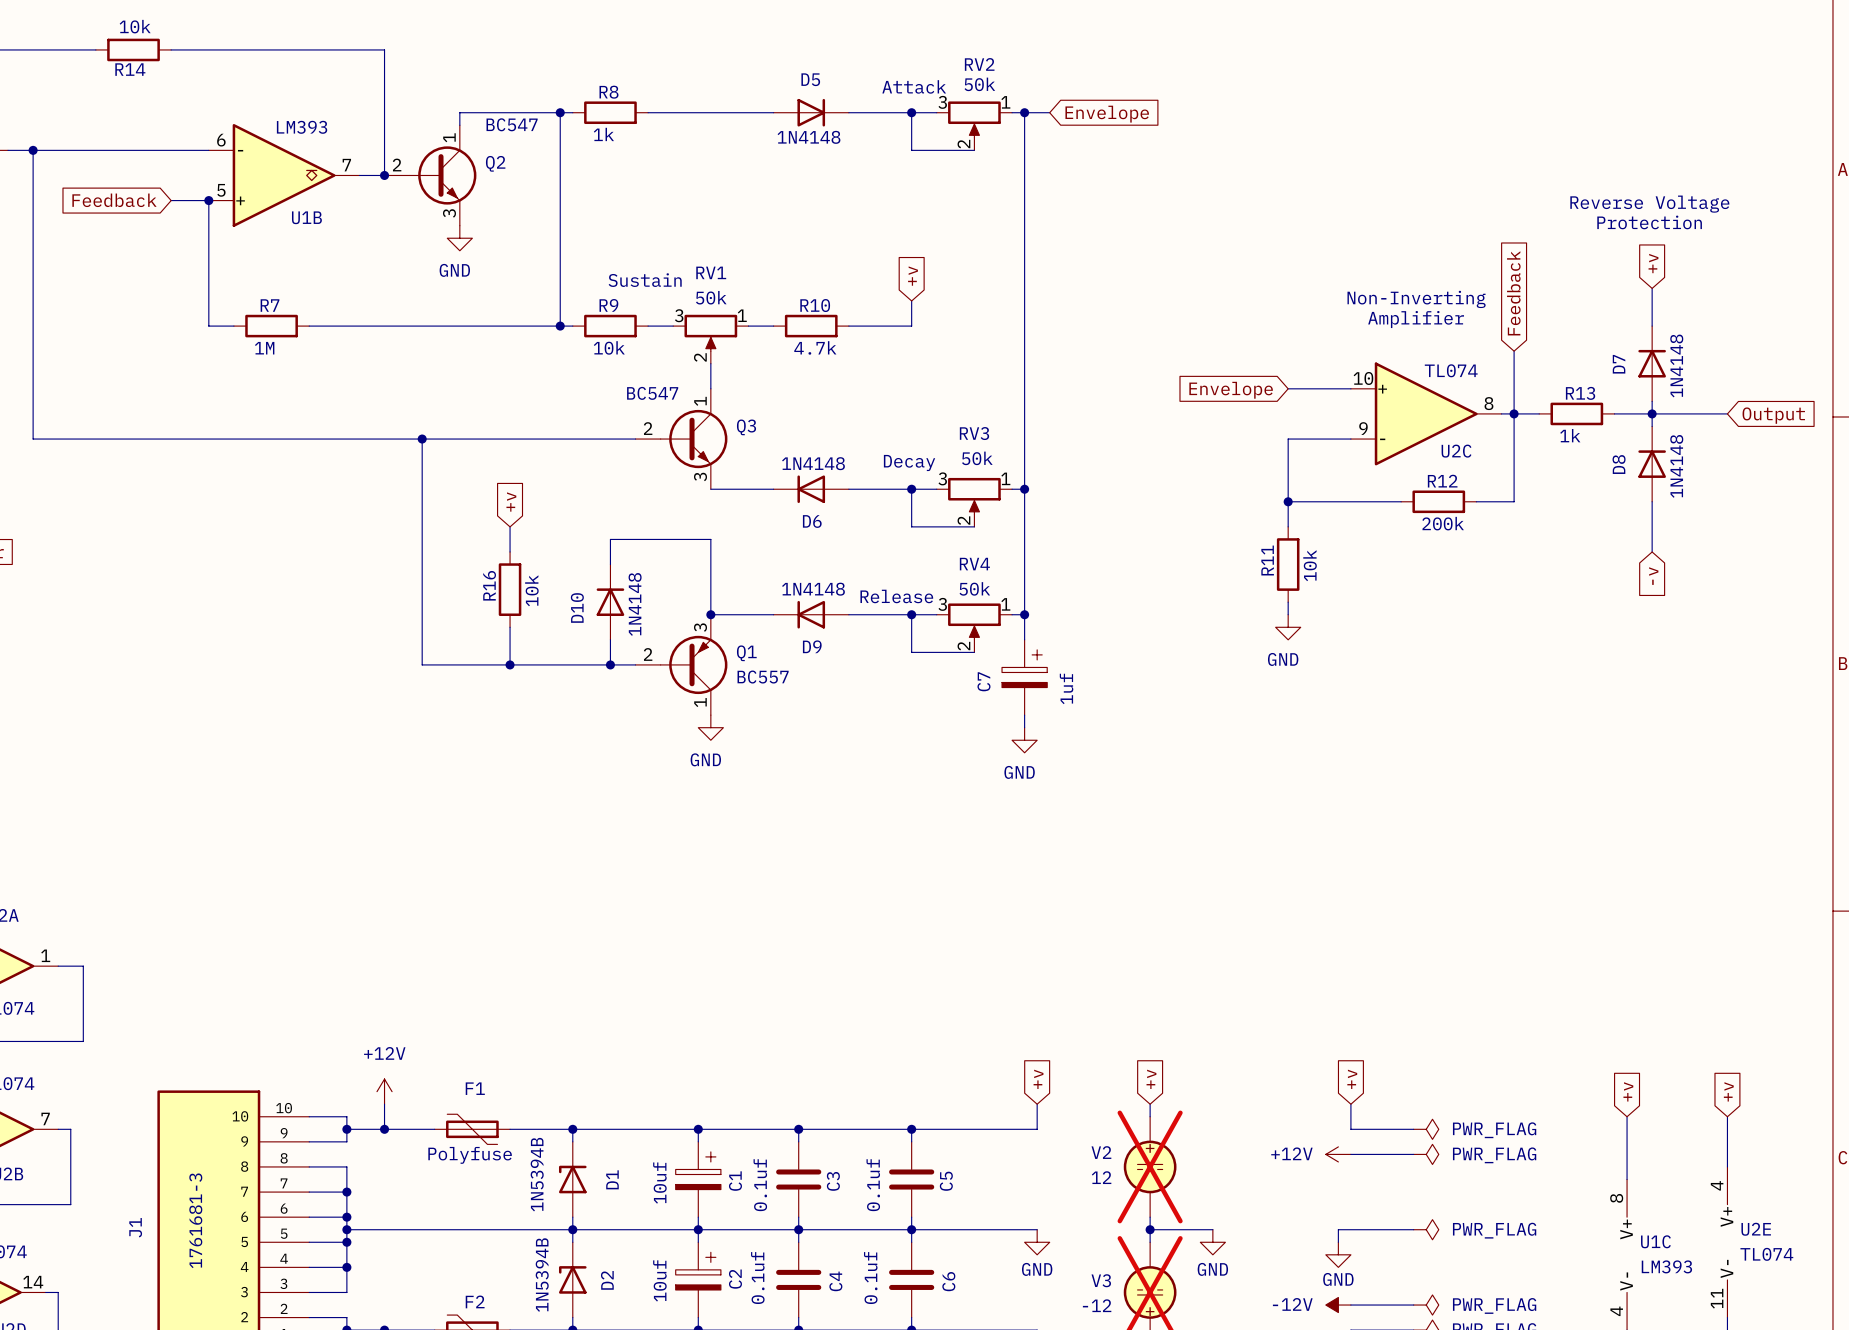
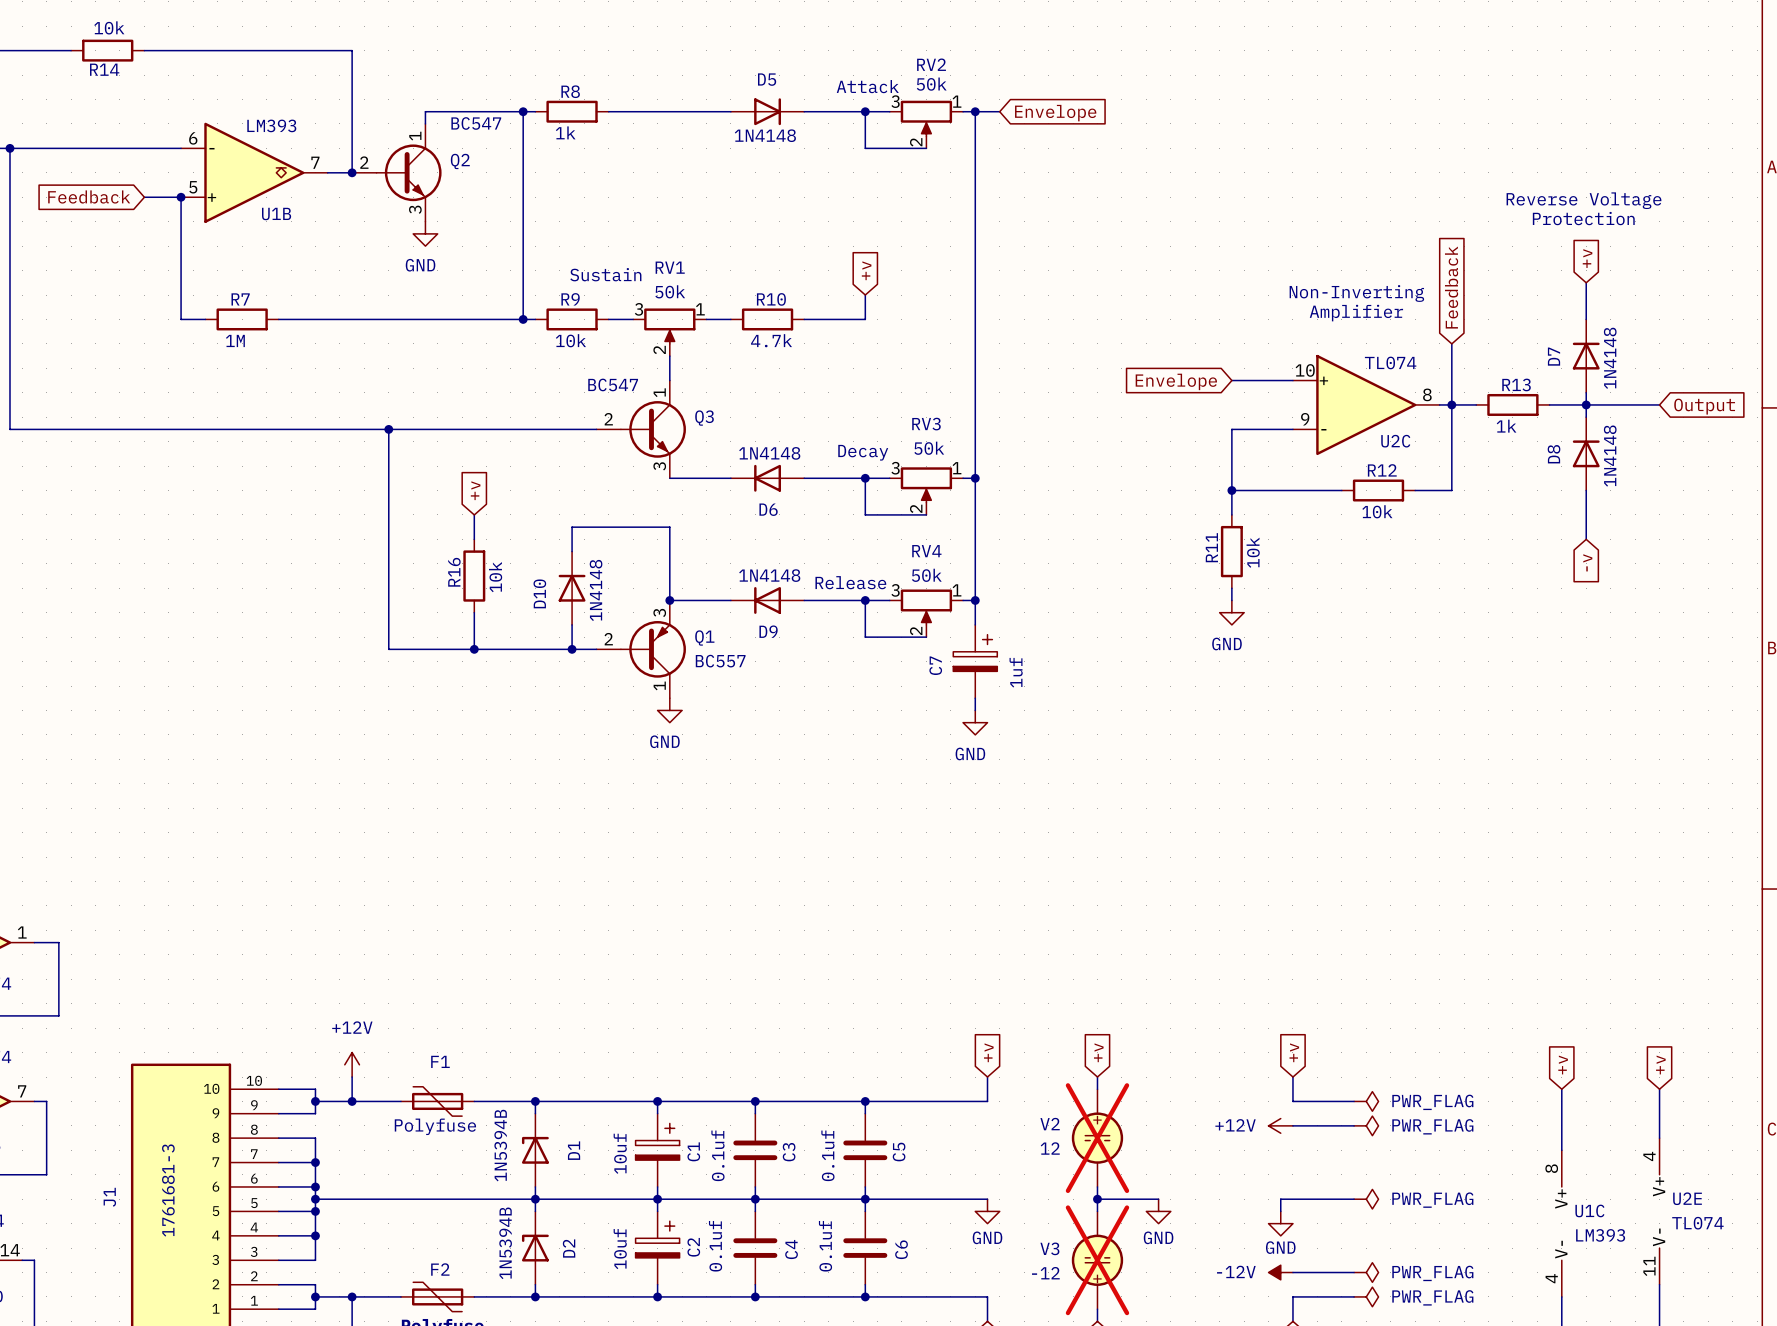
R12 value: 200k (1443, 523) -> 10k (1377, 511)

